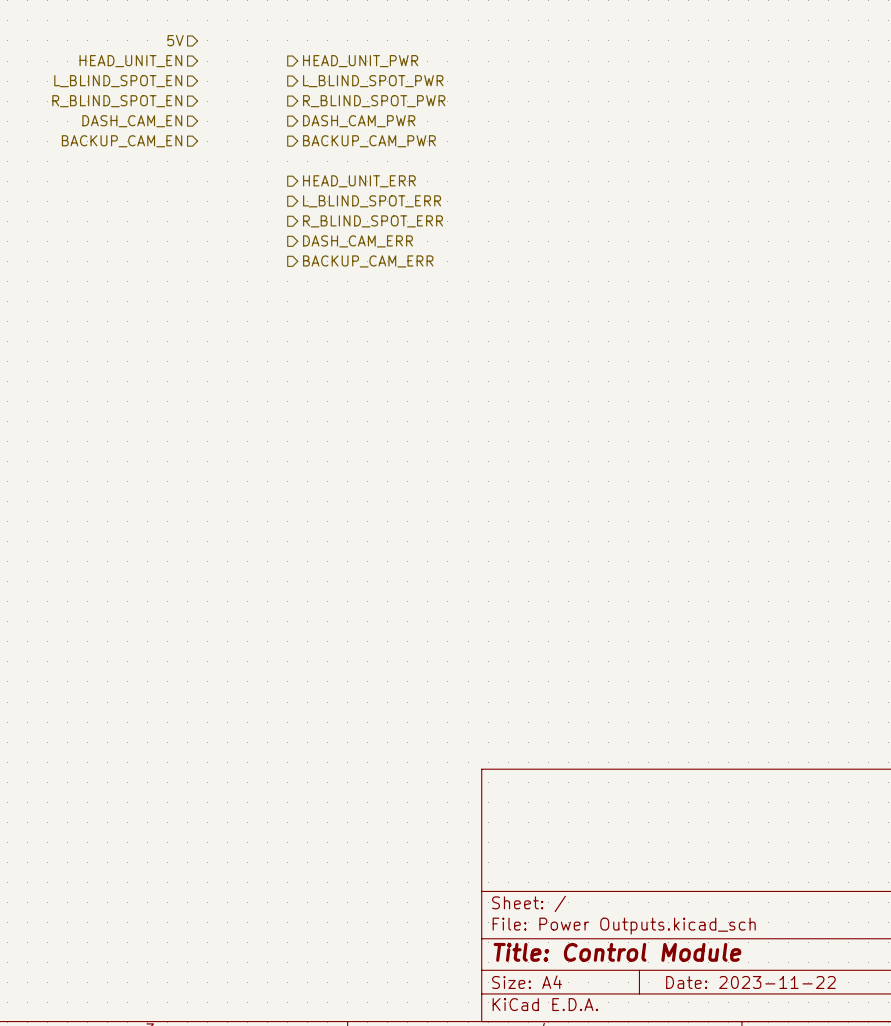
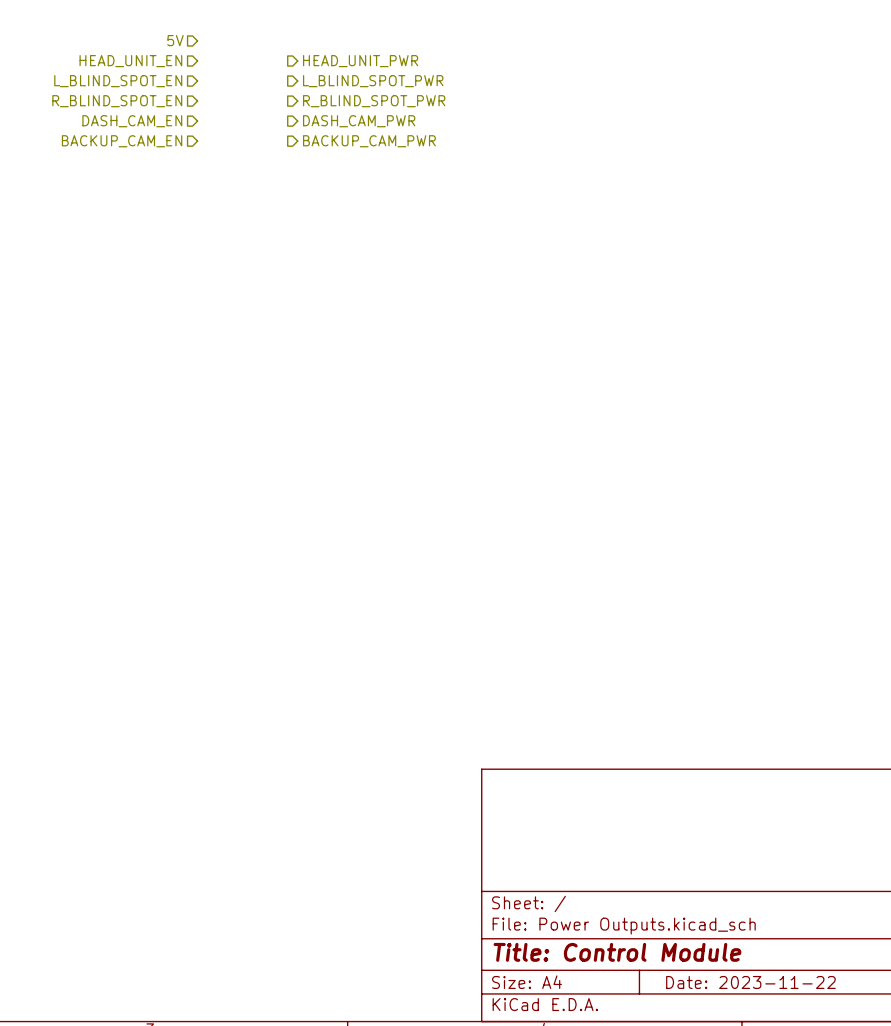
hierarchical label: HEAD_UNIT_ERR (359, 181) -> none
hierarchical label: L_BLIND_SPOT_ERR (372, 201) -> none
hierarchical label: R_BLIND_SPOT_ERR (373, 221) -> none
hierarchical label: DASH_CAM_ERR (357, 241) -> none
hierarchical label: BACKUP_CAM_ERR (368, 261) -> none

